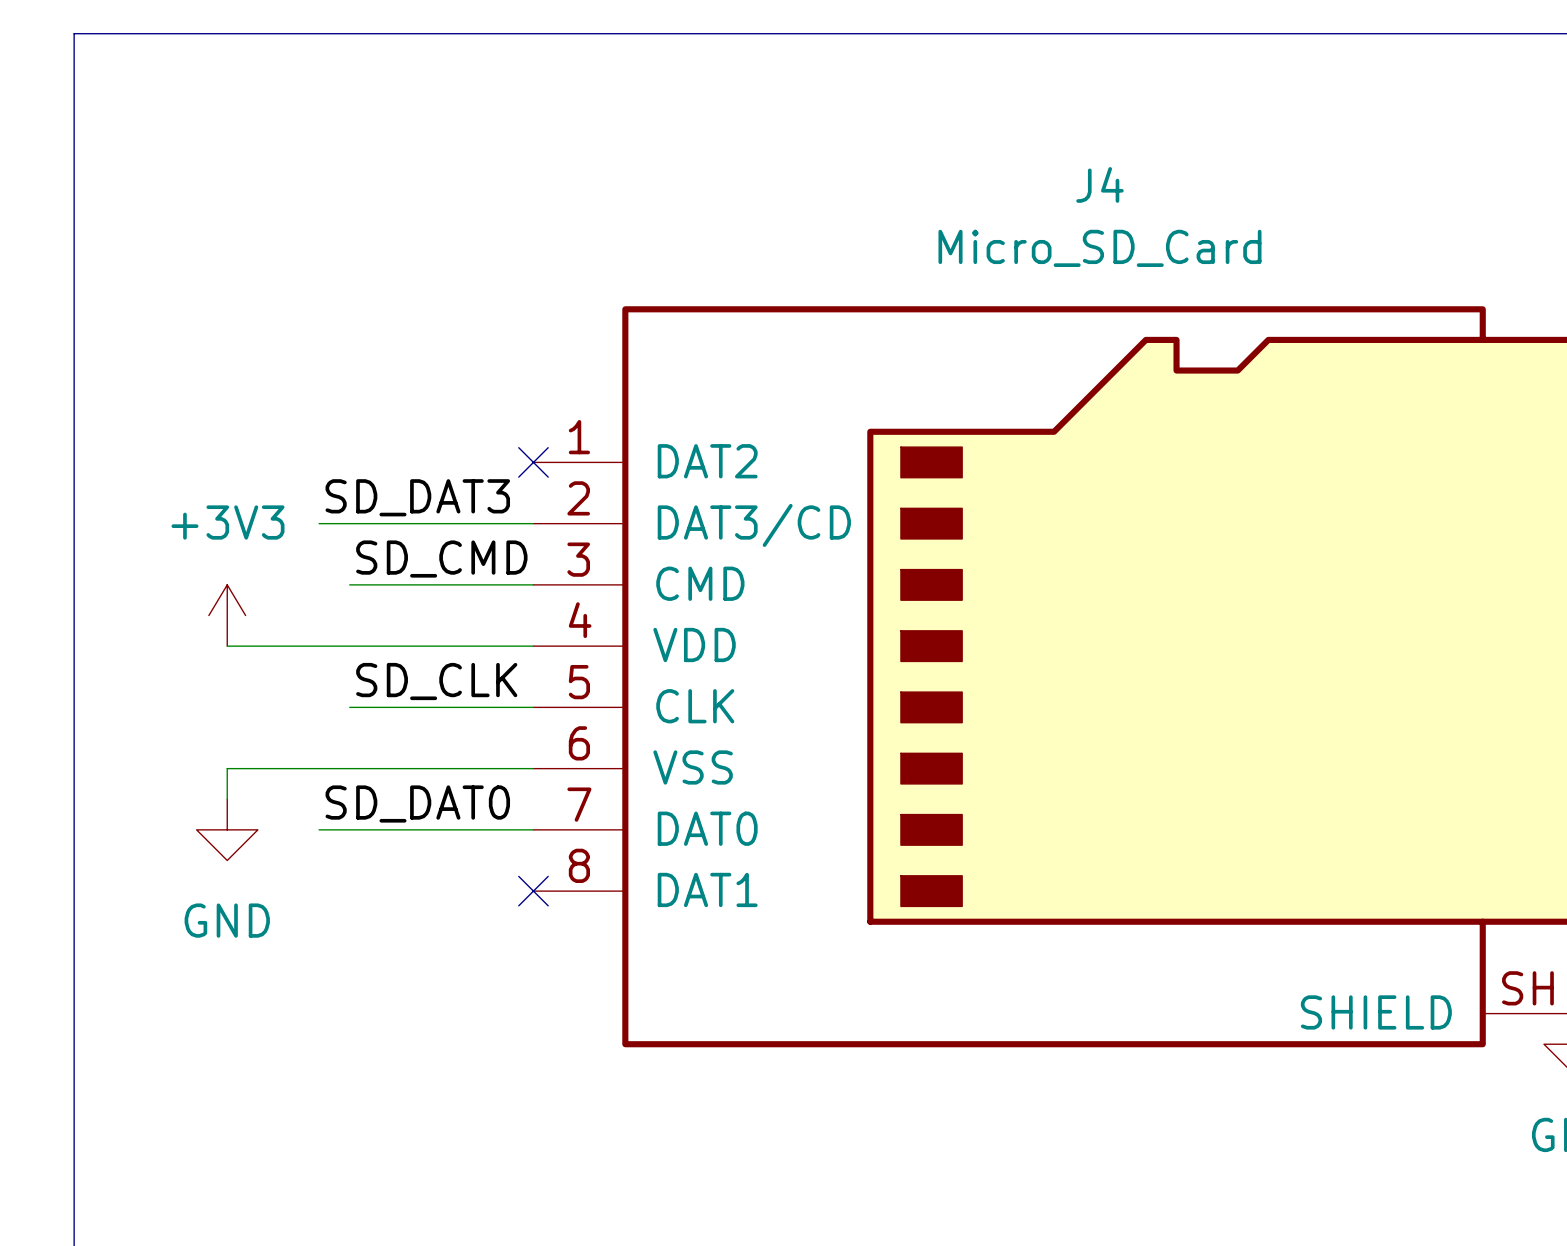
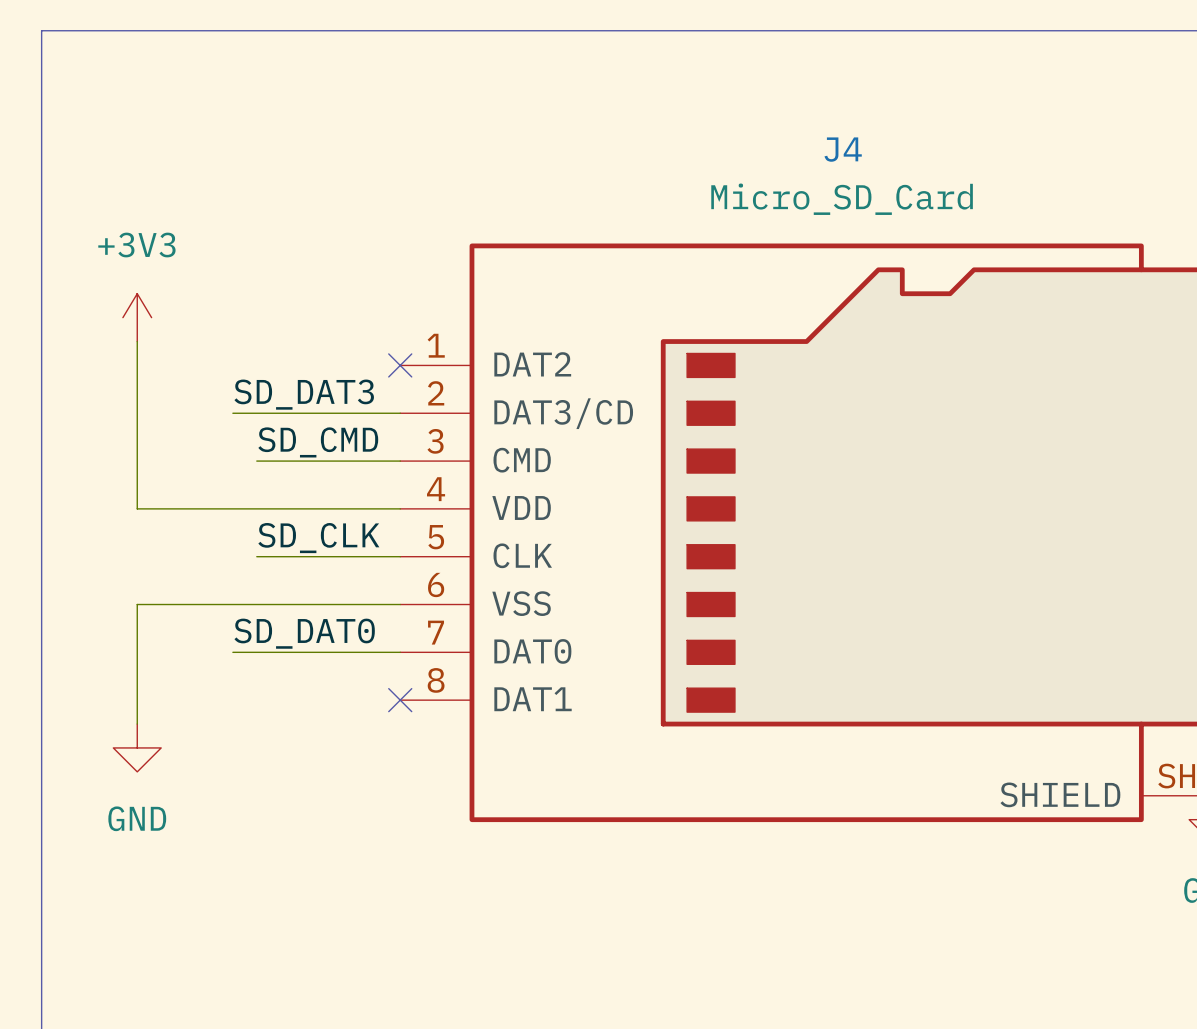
wire: none -> (137, 341) (137, 508) (161, 508)
power symbol position: +3V3 (227, 615) -> +3V3 (137, 317)
wire: (227, 768) (227, 799) -> (161, 604) (137, 604) (137, 724)
power symbol position: GND (227, 829) -> GND (137, 747)

